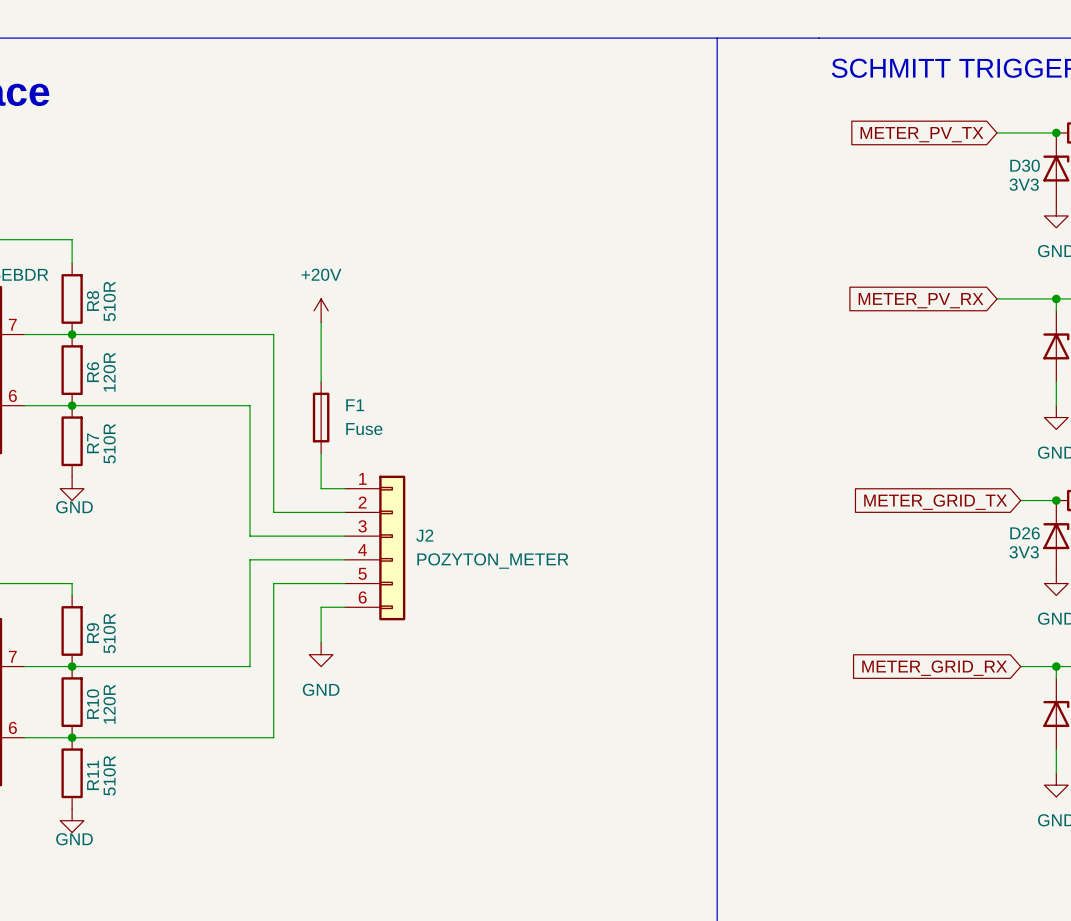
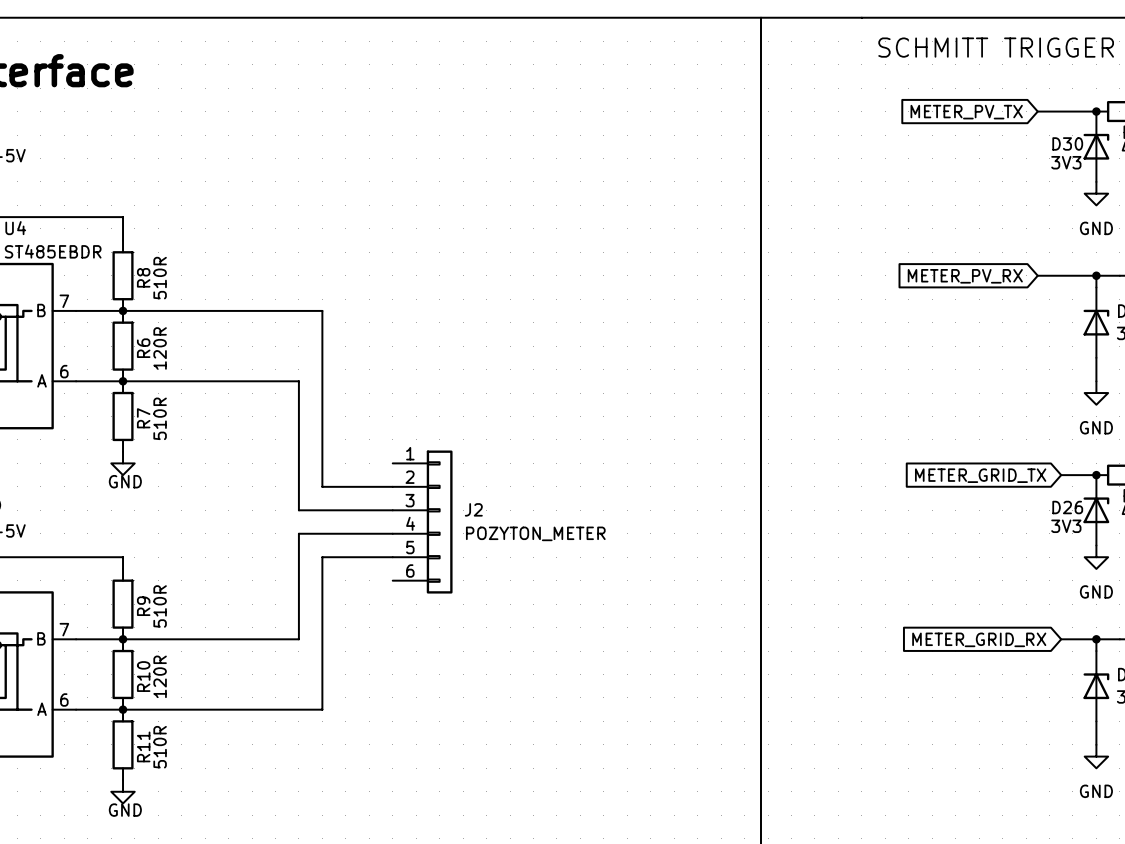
power symbol: +20V (321, 310) -> none
wire: (321, 322) (321, 381) -> none
F1: Fuse (321, 417) -> none
wire: (321, 453) (321, 488) (344, 488) -> none
wire: (344, 607) (321, 607) (321, 642) -> none
power symbol: GND (321, 654) -> none

